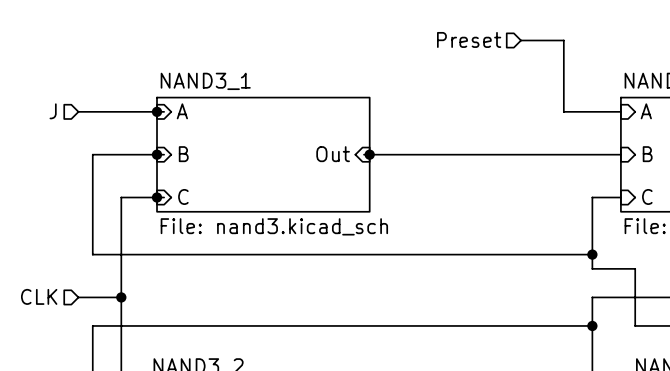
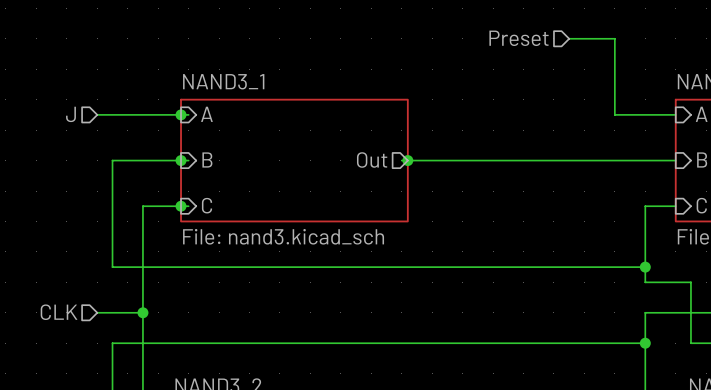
sheet pin shape: input (333, 154) -> output (372, 159)

